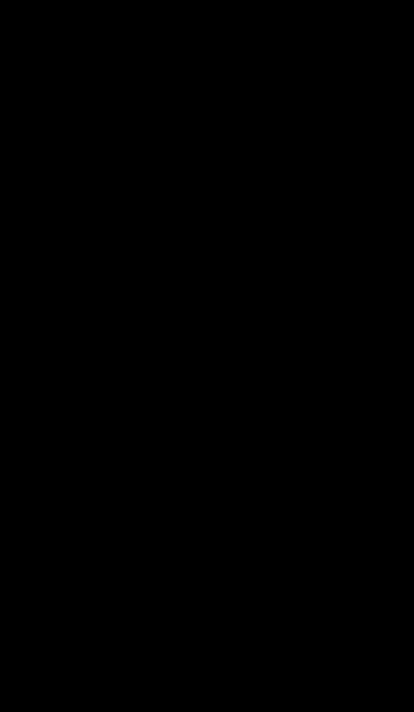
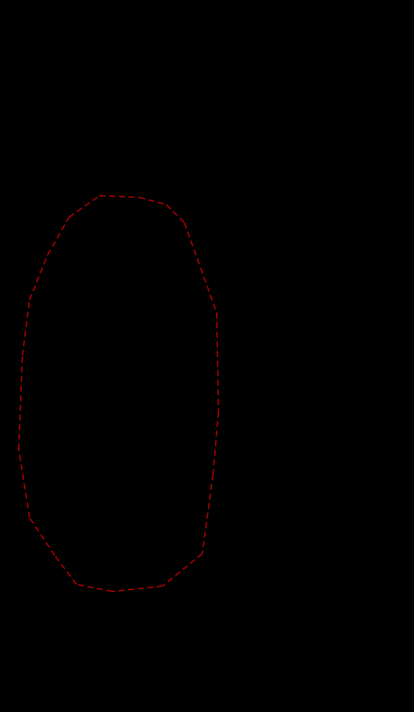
top zone outline: none -> (99, 195) (69, 217) (47, 254) (29, 299) (22, 355) (18, 449) (29, 517) (76, 584) (112, 591) (162, 586) (202, 553) (213, 474) (218, 411) (216, 312) (184, 222) (166, 204) (139, 197) (99, 195)

